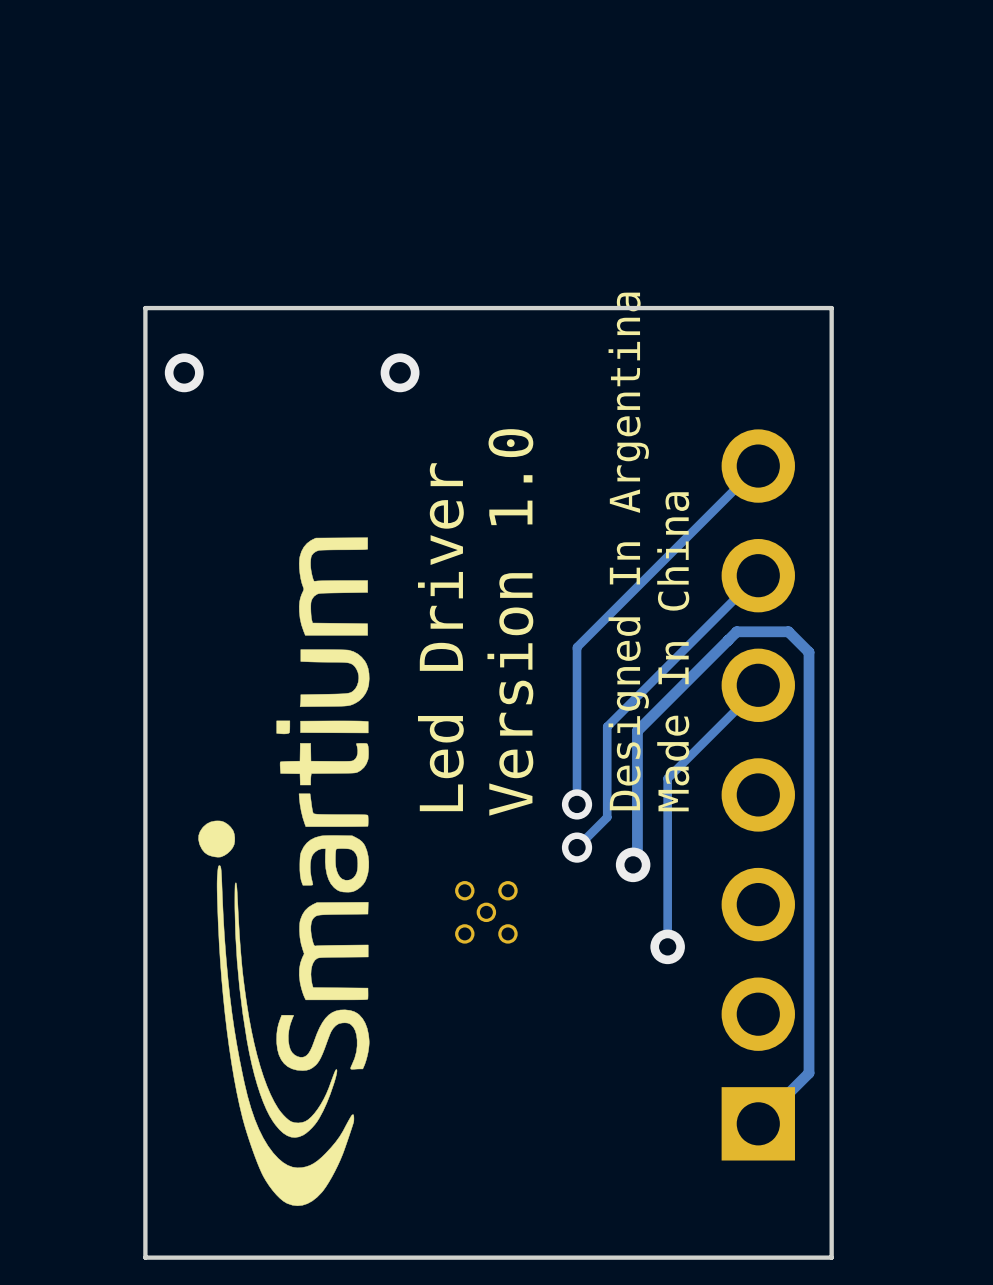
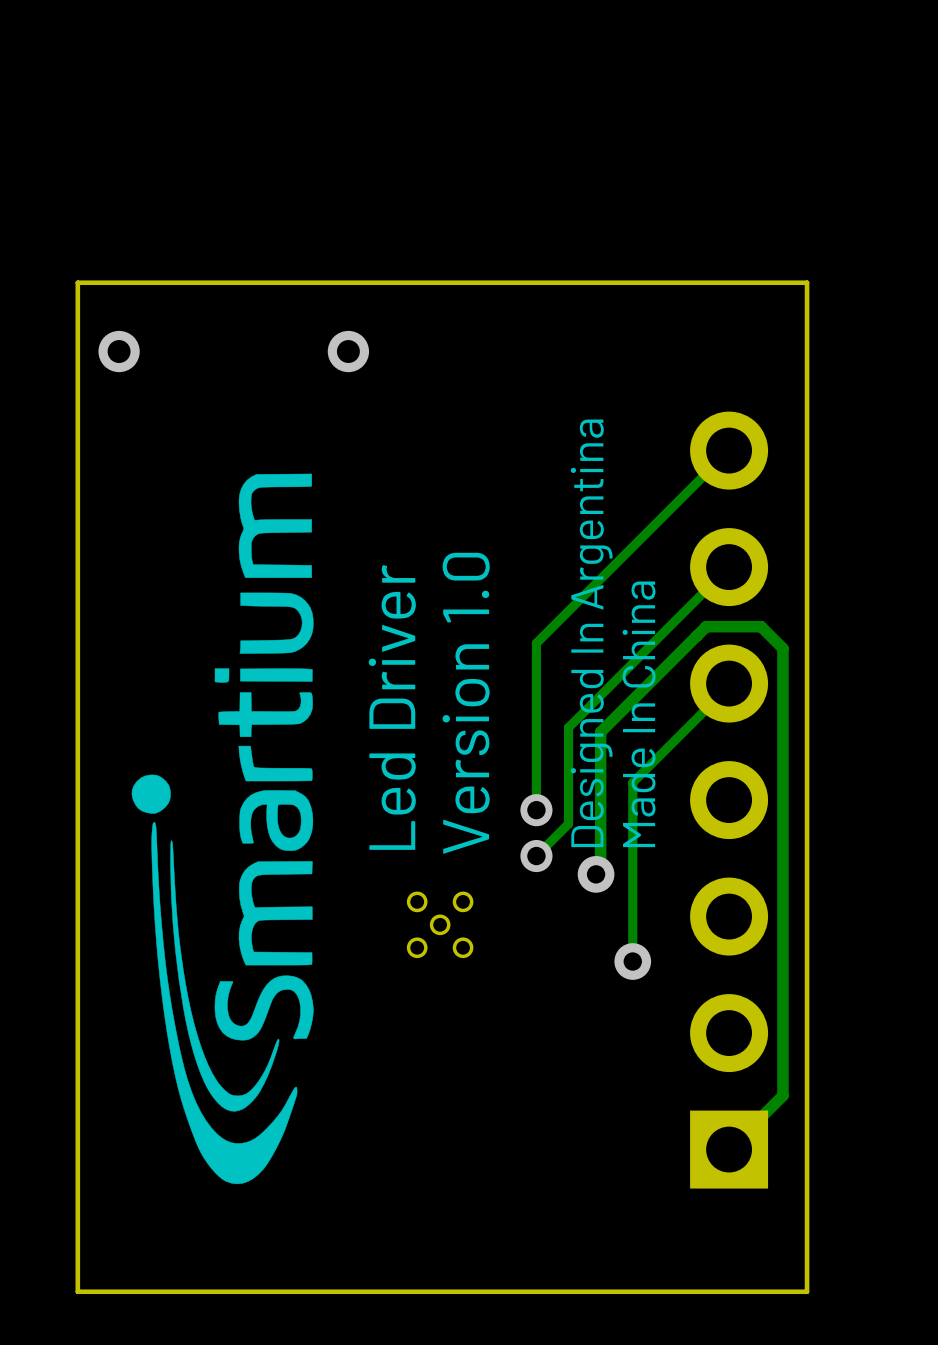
text position: Designed In Argentina (628, 551) -> Designed In Argentina (591, 633)
text position: Version 1.0 (510, 622) -> Version 1.0 (466, 703)
text position: Led Driver (440, 637) -> Led Driver (392, 707)
text position: Made In China (673, 651) -> Made In China (639, 714)
drawing position: (283, 871) -> (222, 828)

